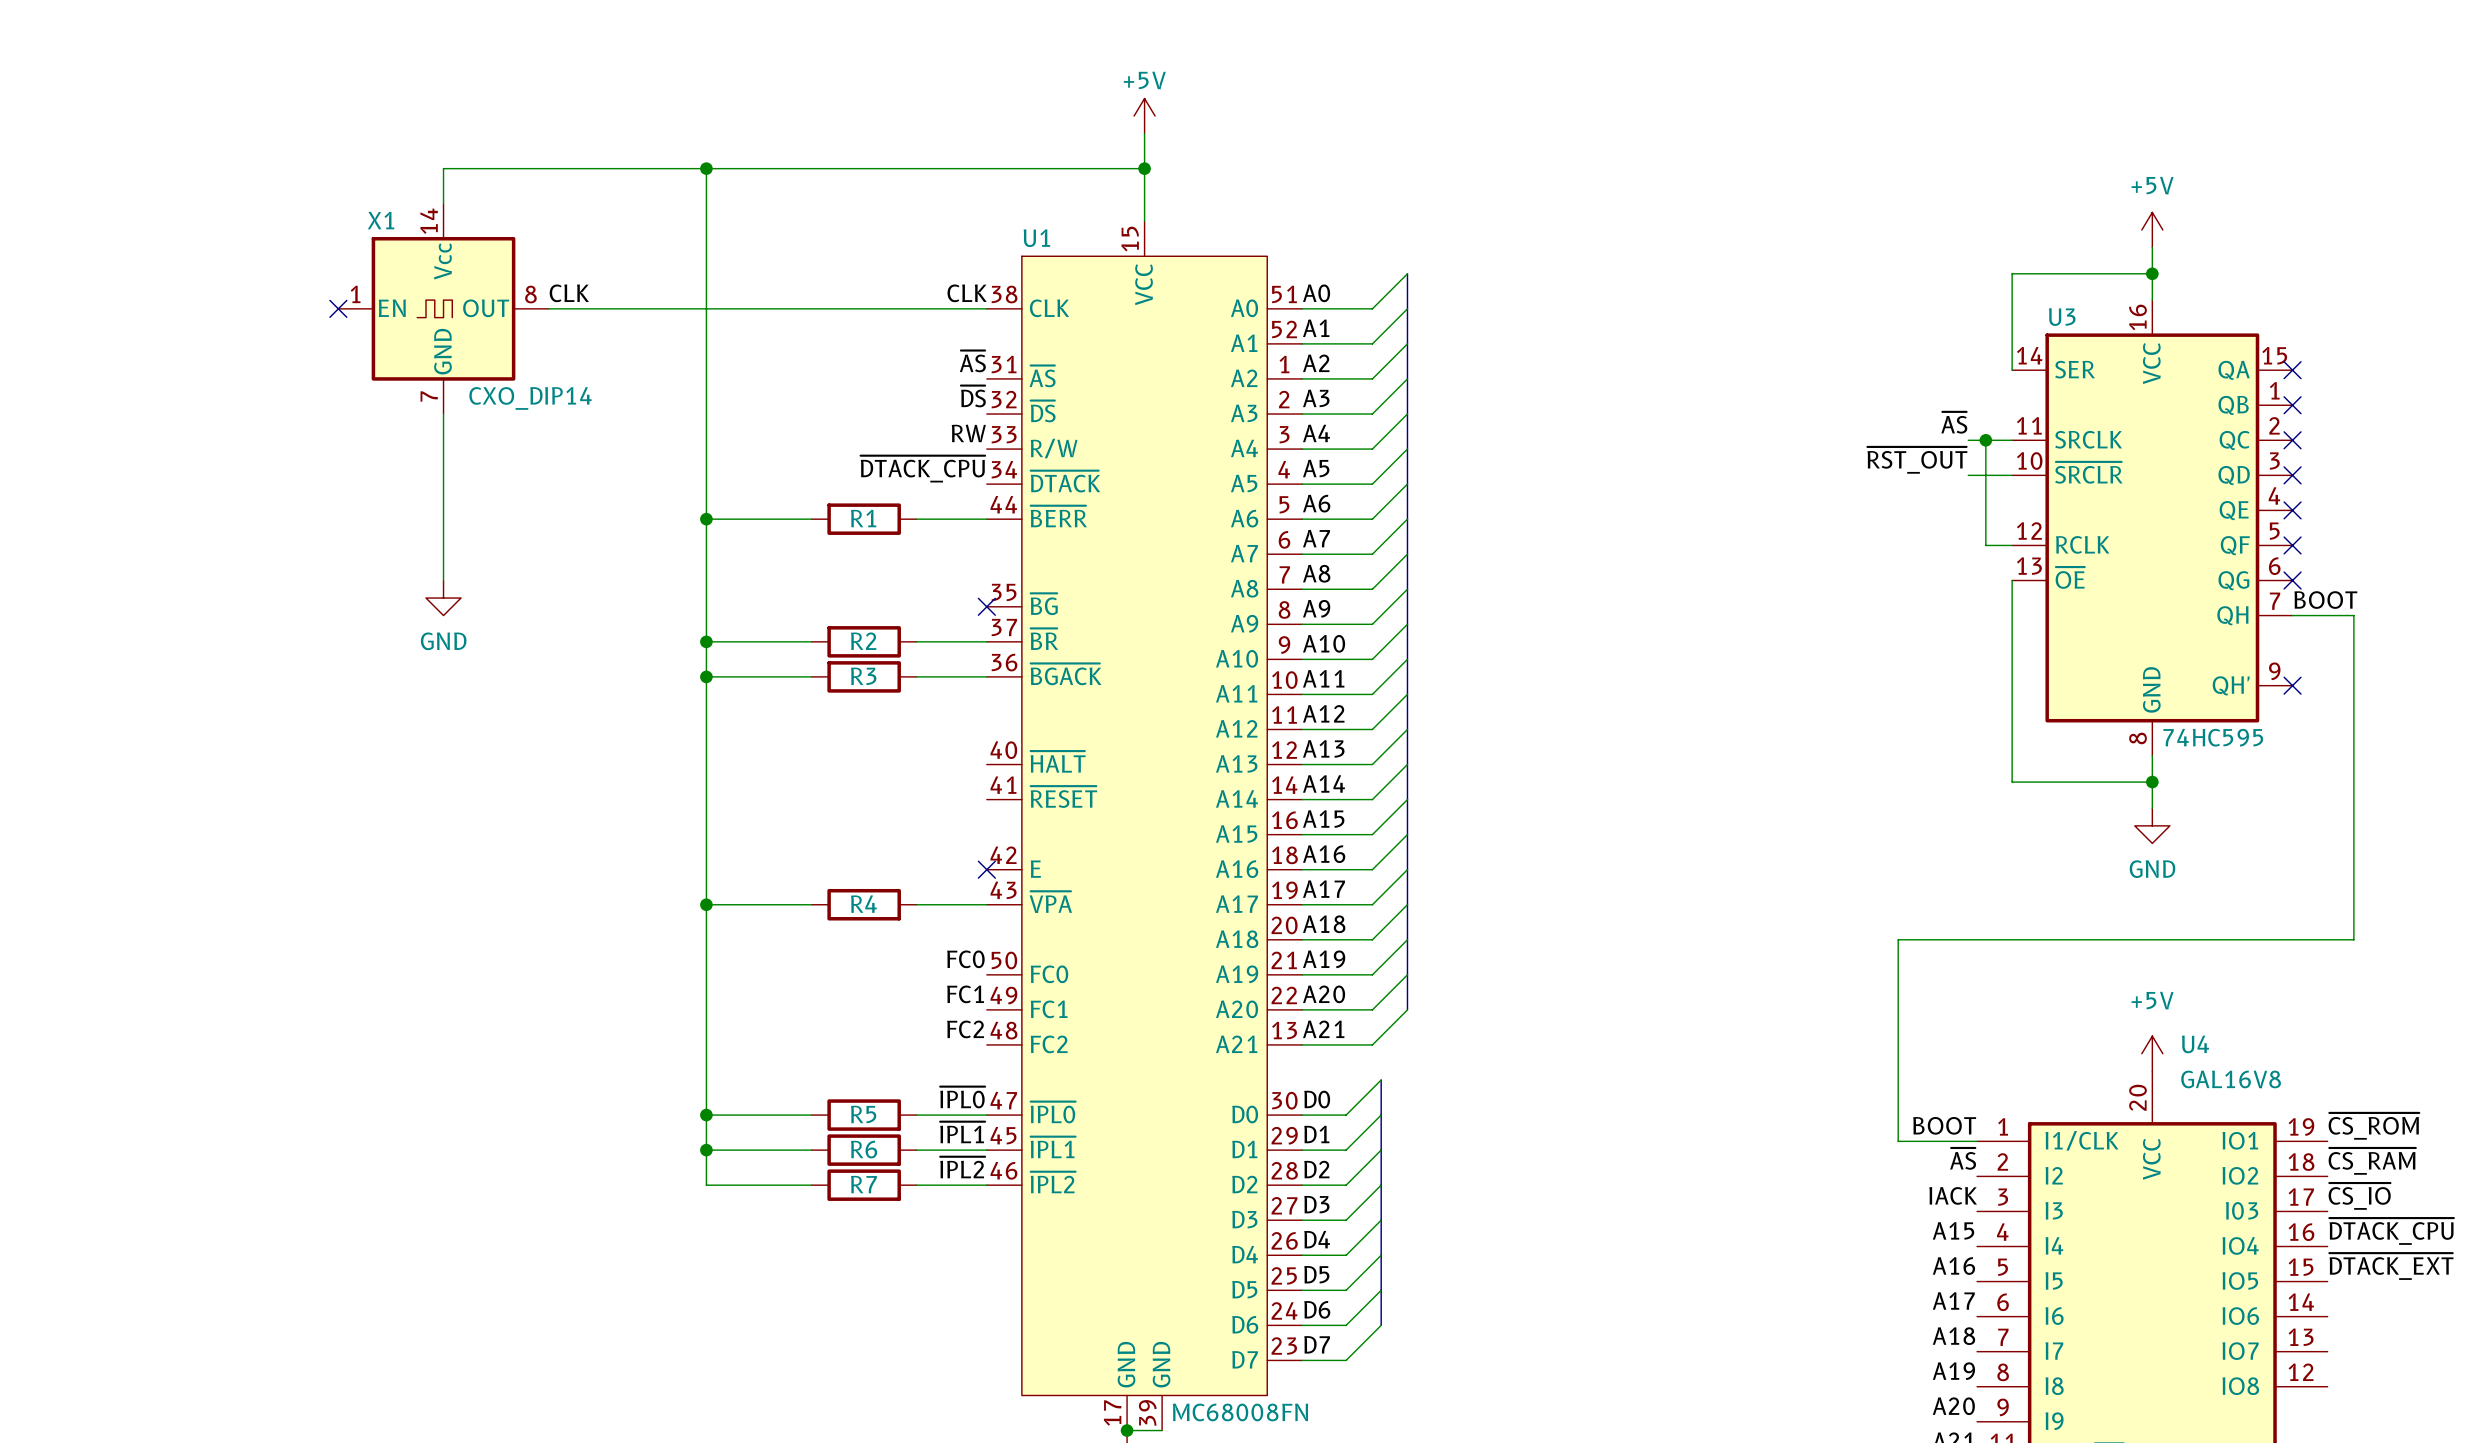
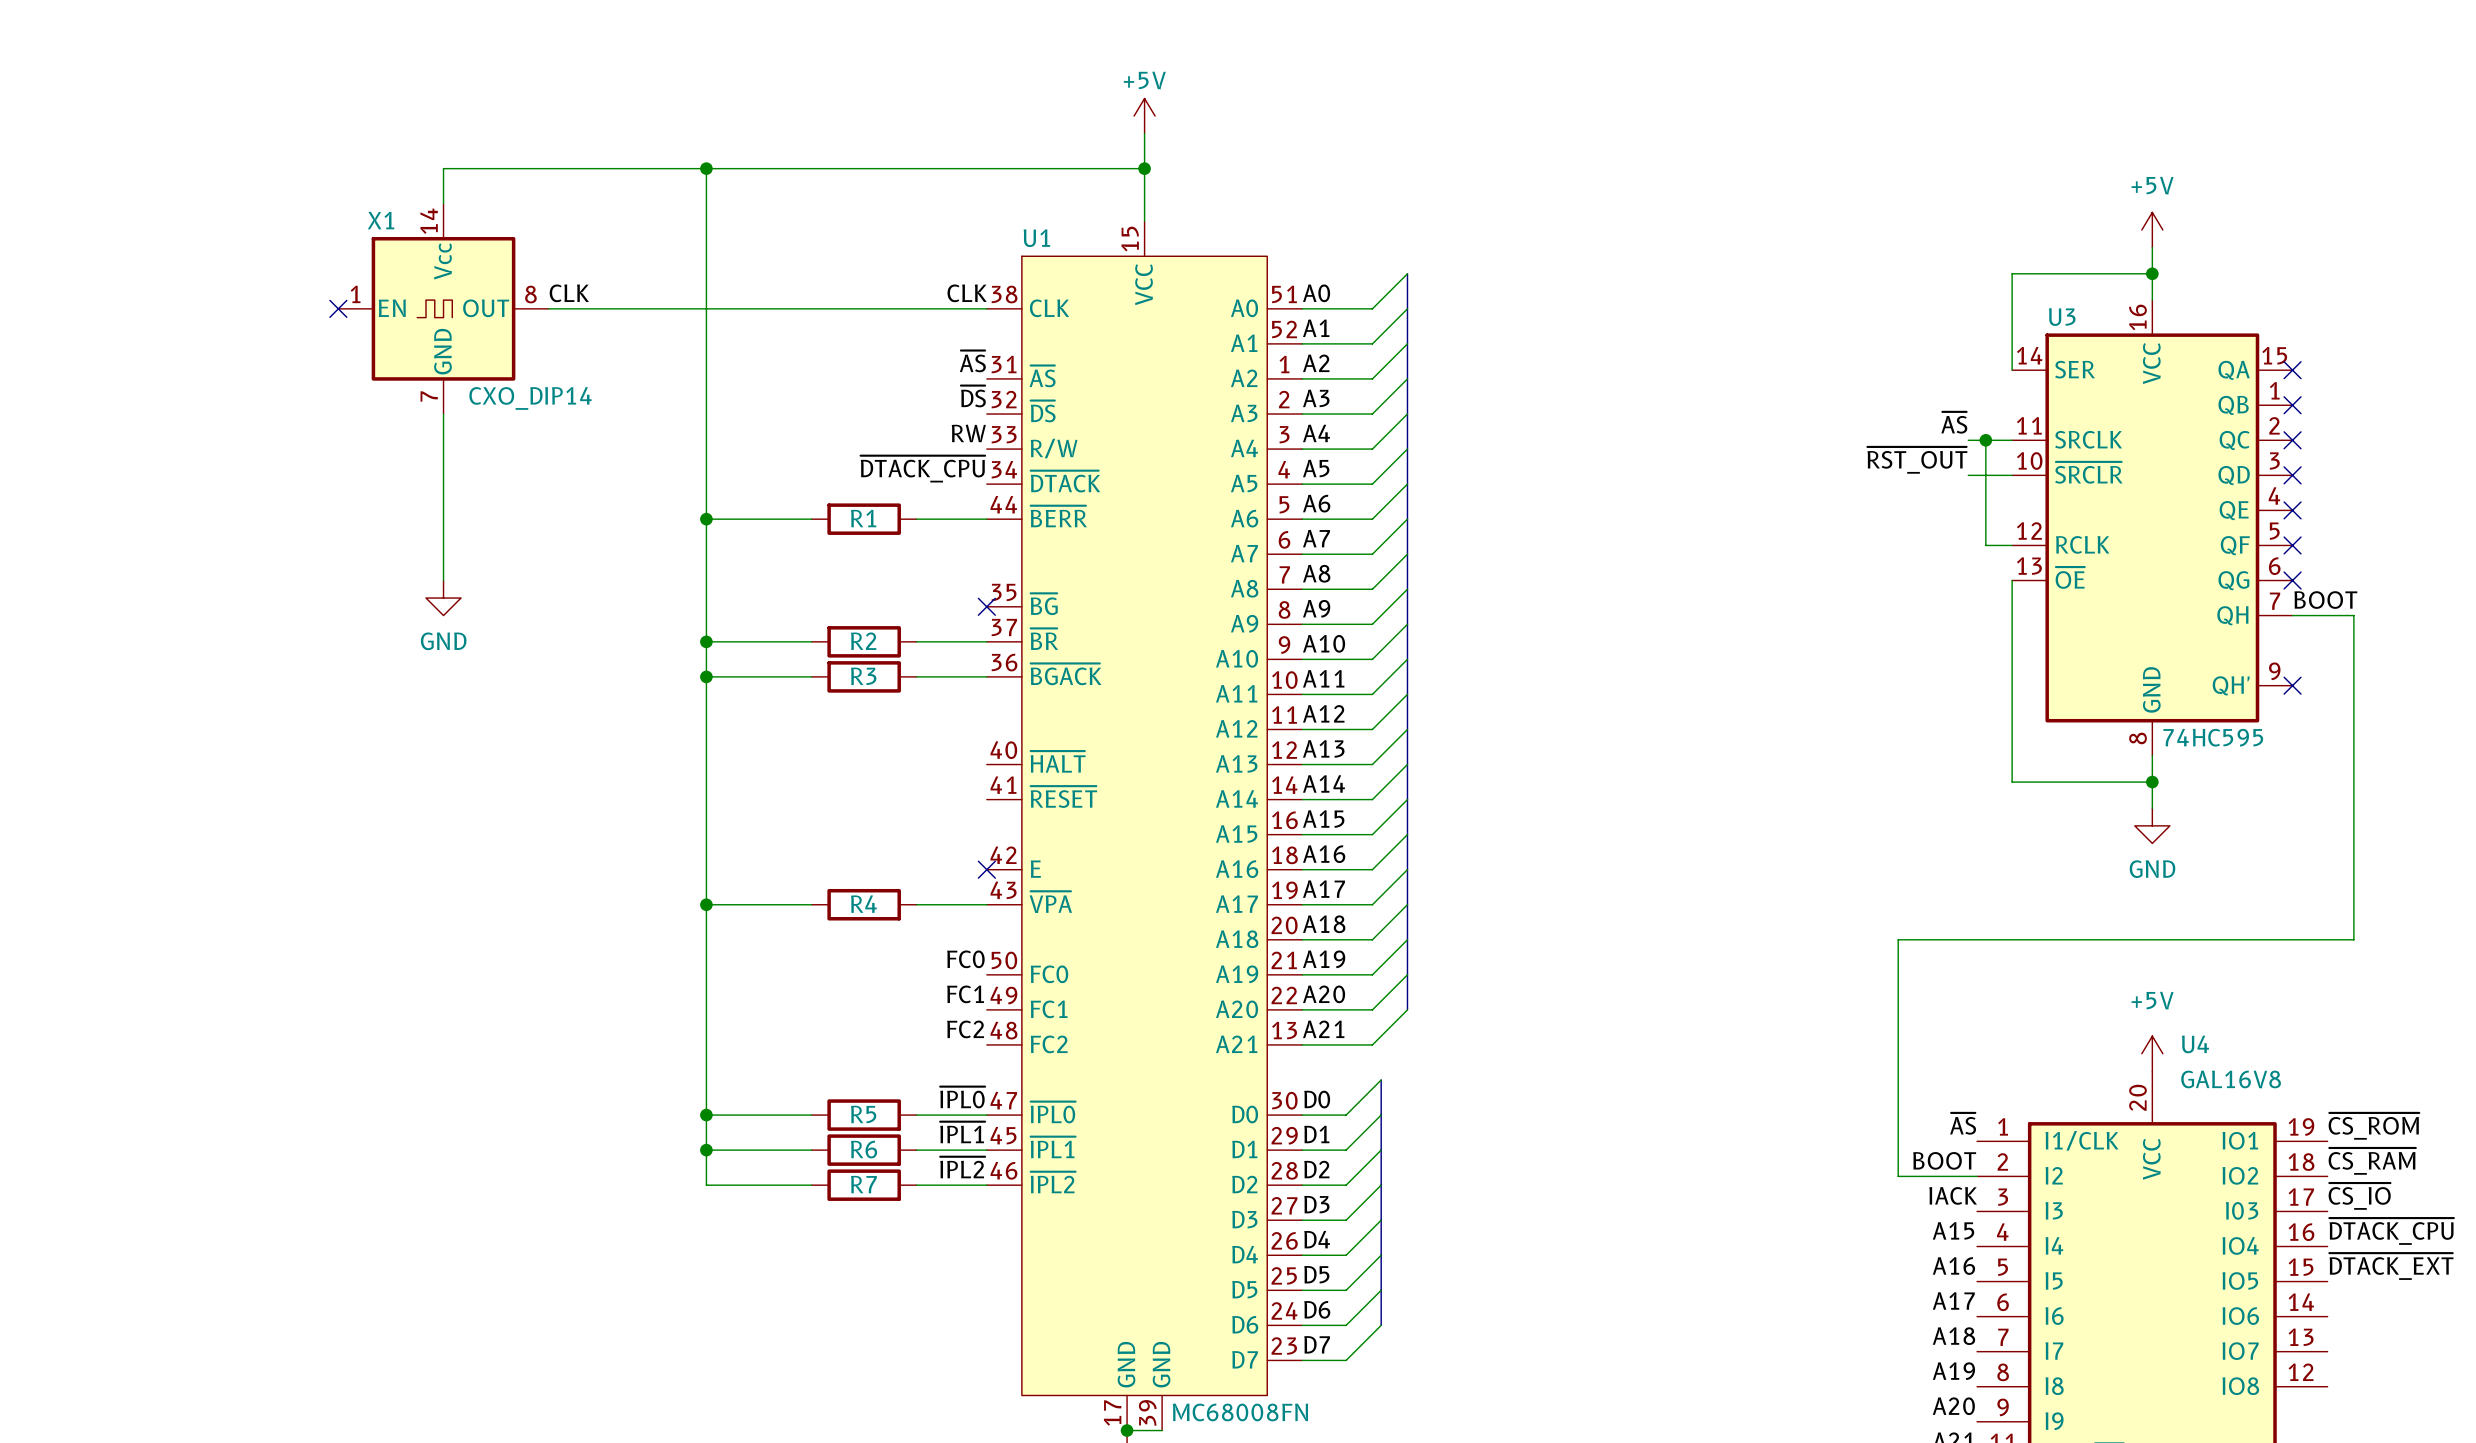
label: BOOT (1944, 1125) -> ~{AS} (1963, 1123)
wire: (1898, 1141) (1977, 1141) -> (1898, 1141) (1898, 1176) (1977, 1176)
label: ~{AS} (1963, 1158) -> BOOT (1944, 1160)

